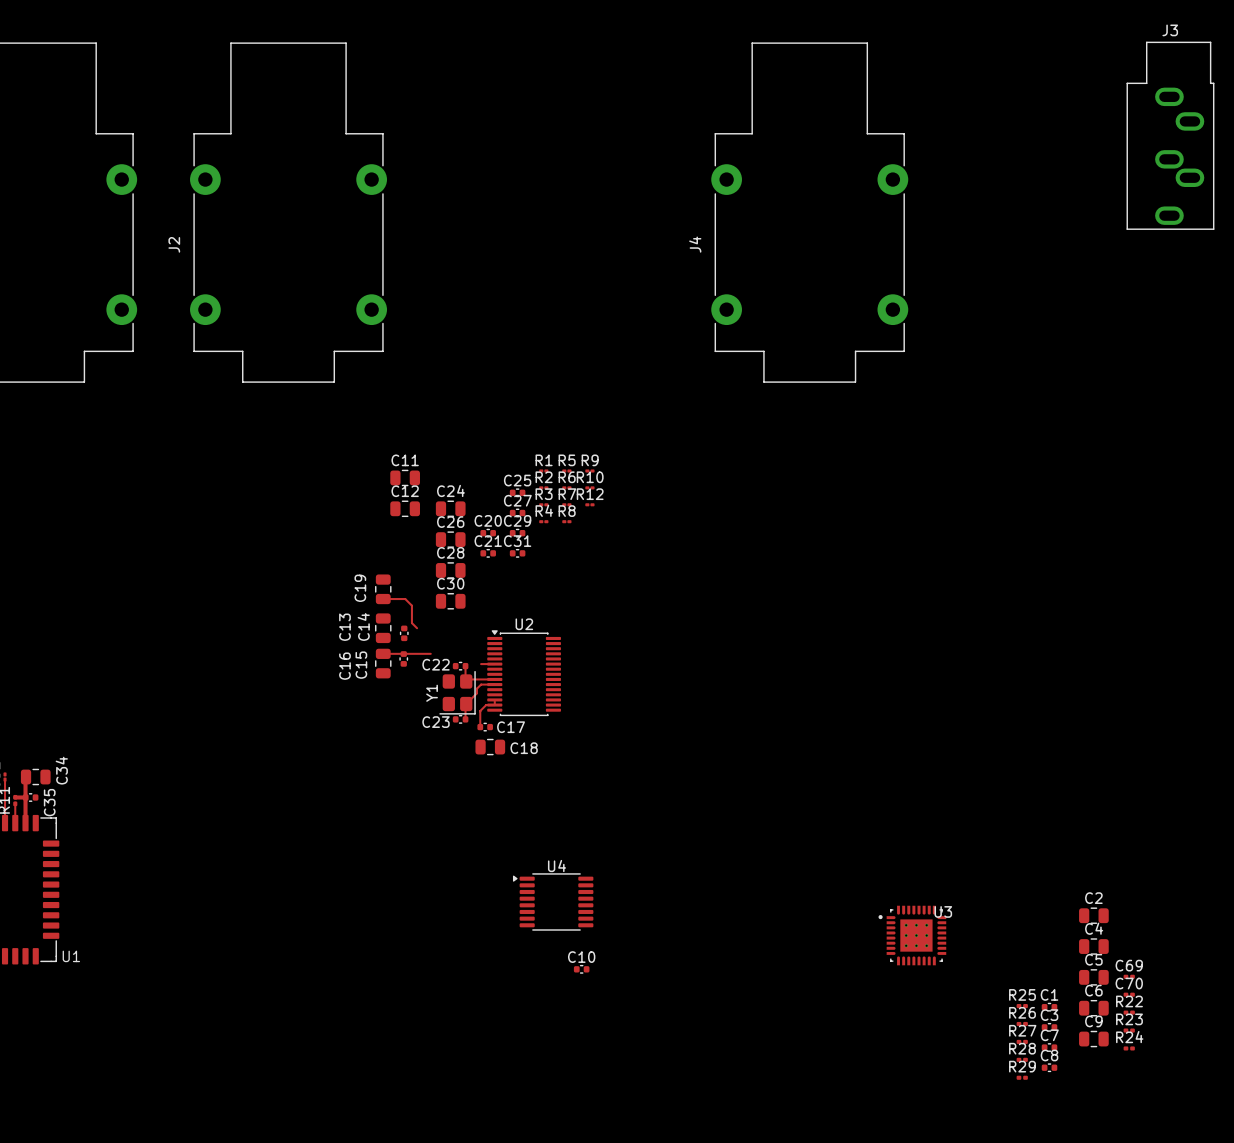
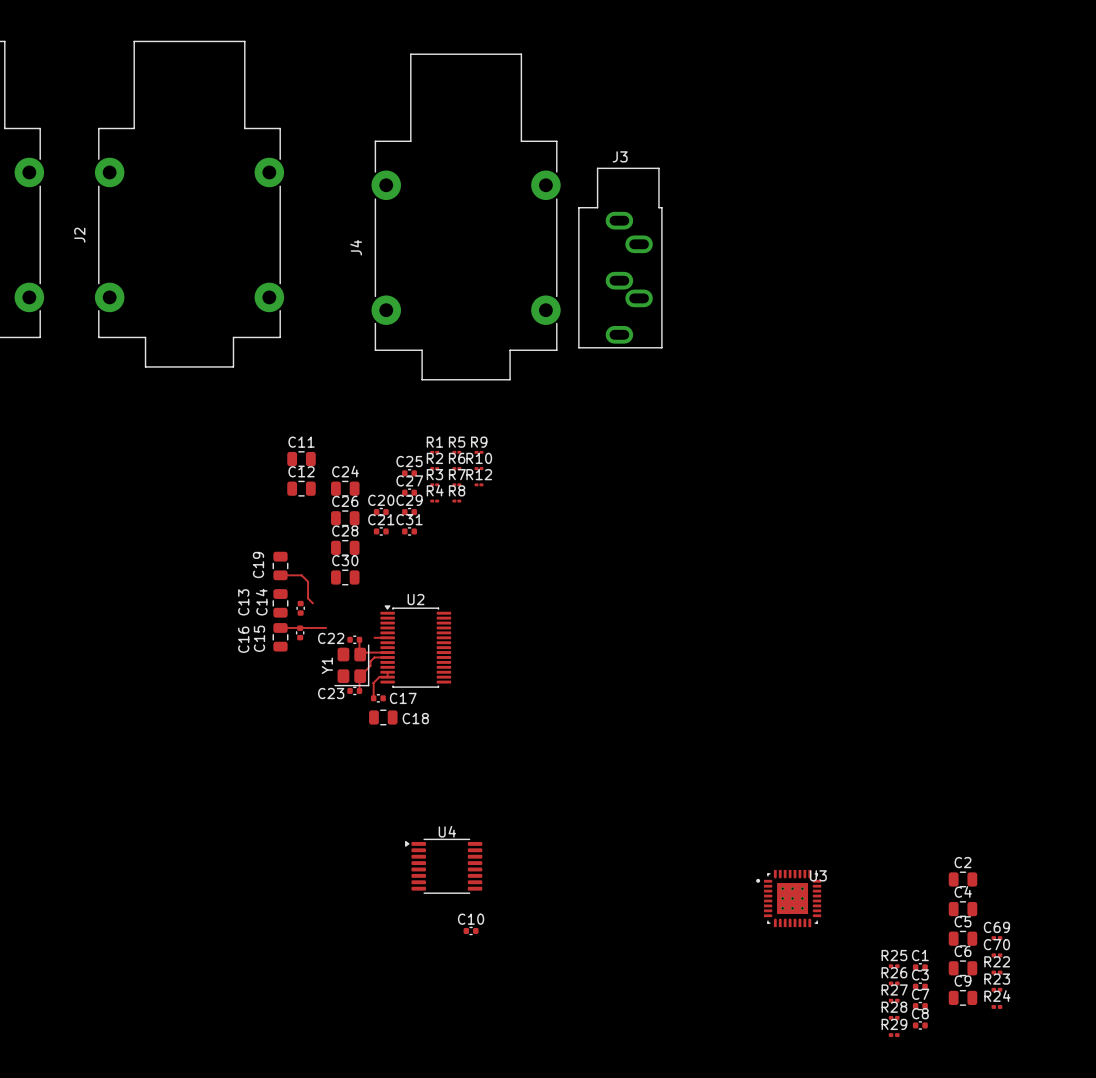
J3 position: (1170, 135) -> (620, 258)
J4 position: (809, 212) -> (466, 216)

